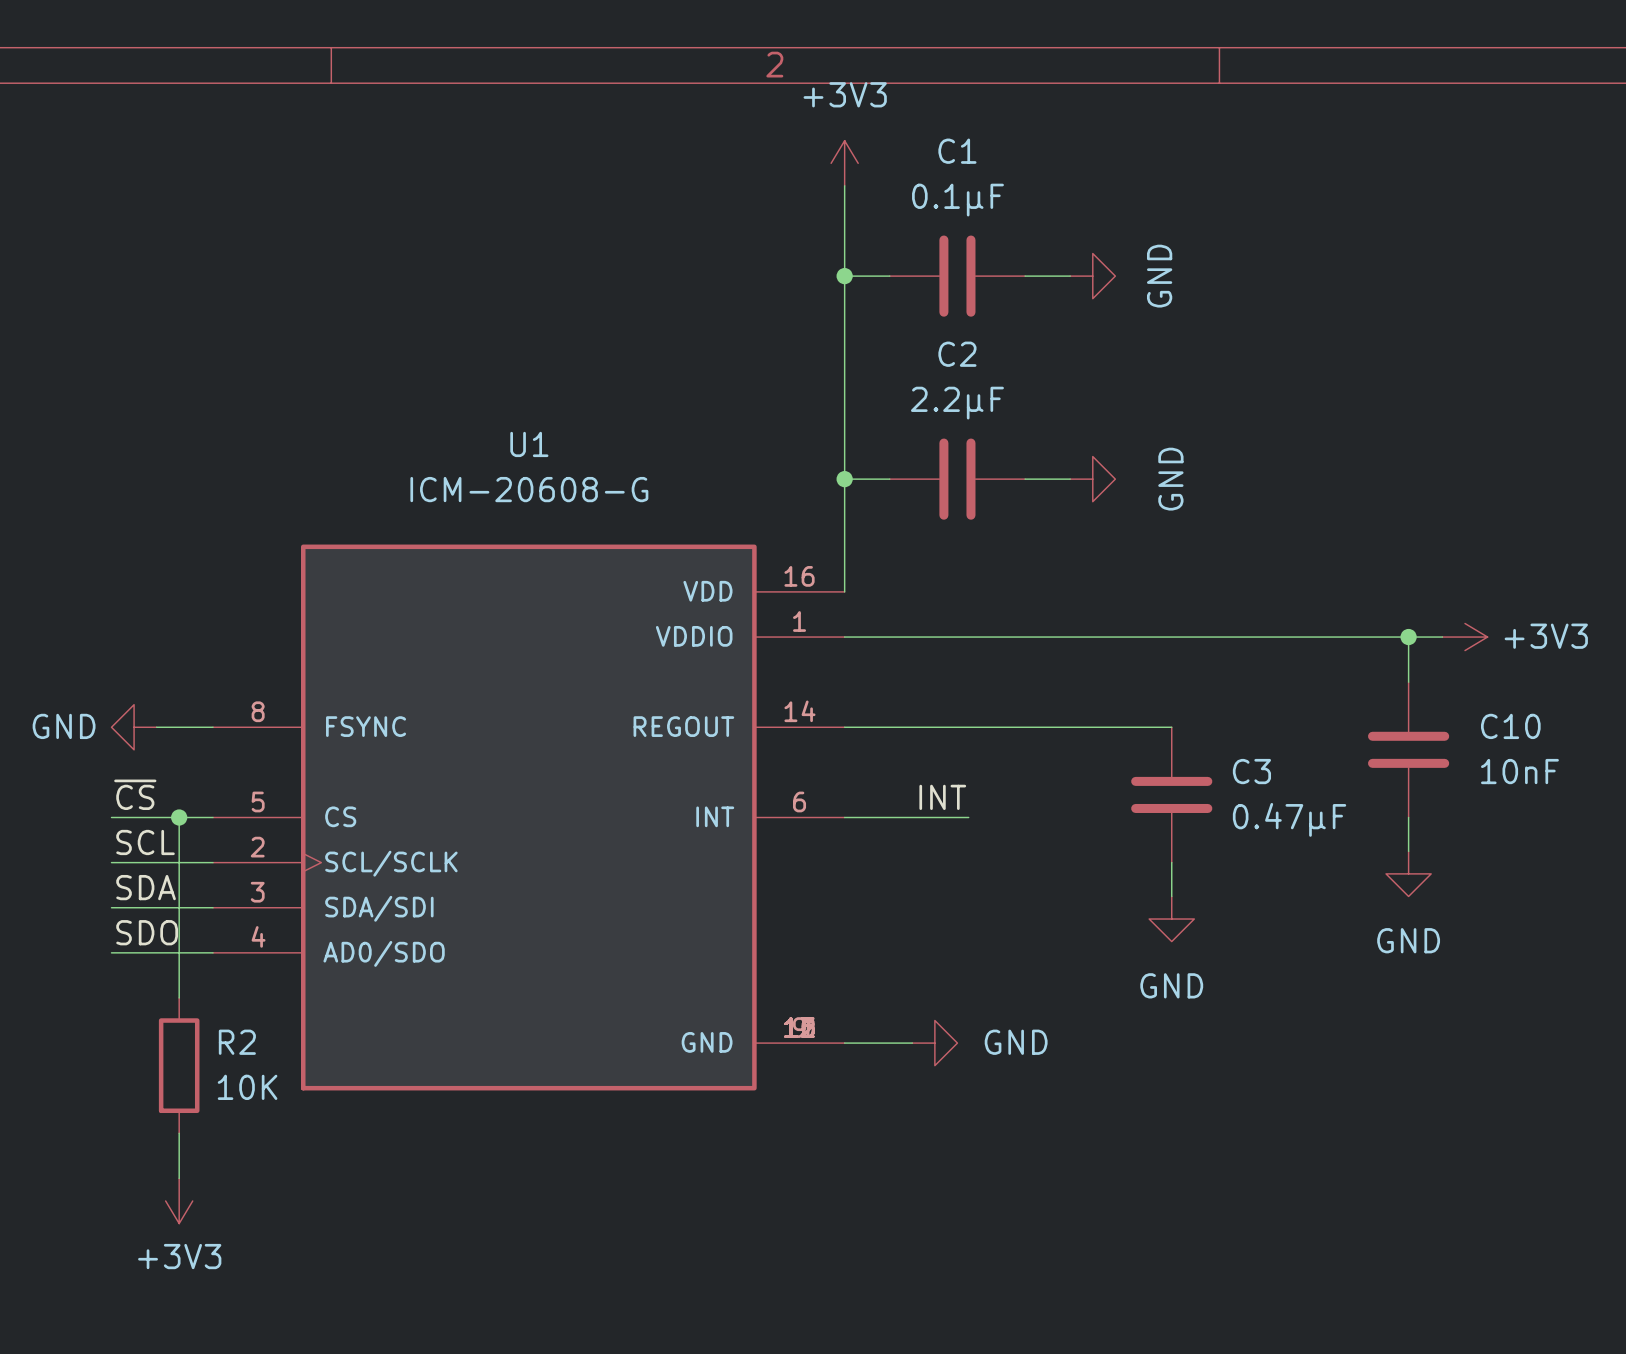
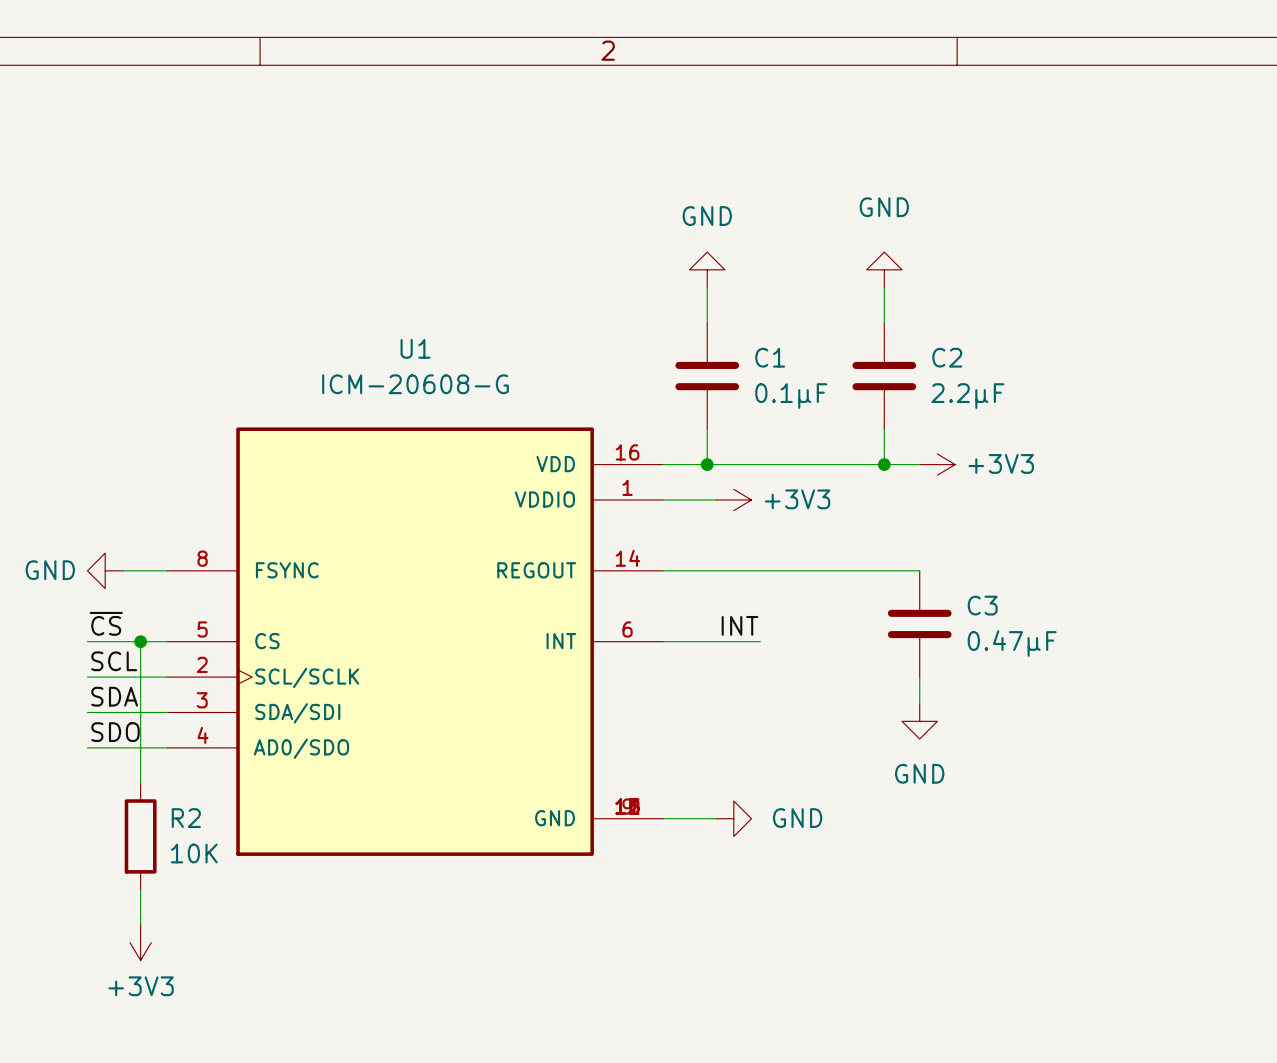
C1 name position: C1 (957, 151) -> C1 (770, 357)
power symbol: +3V3 (844, 163) -> none
wire: (844, 185) (844, 591) -> (919, 464) (662, 464)
C1 value position: 0.1µF (957, 200) -> 0.1µF (791, 396)
wire: (844, 276) (889, 276) -> none
junction: (844, 276) -> none
C1 rotation: 0° (957, 276) -> 90° clockwise (707, 376)
C1 position: (957, 276) -> (707, 376)
wire: (1025, 276) (1070, 276) -> none
power symbol: GND (1092, 276) -> none
power symbol: none -> GND (707, 269)
power symbol: none -> GND (884, 269)
C2 name position: C2 (957, 354) -> C2 (947, 357)
wire: none -> (707, 287) (707, 322)
wire: none -> (884, 287) (884, 322)
C2 value position: 2.2µF (957, 403) -> 2.2µF (967, 396)
wire: (844, 479) (889, 479) -> none
junction: (844, 479) -> none
C2 rotation: 0° (957, 479) -> 90° clockwise (884, 376)
C2 position: (957, 479) -> (884, 376)
wire: (1025, 479) (1070, 479) -> none
power symbol: GND (1092, 479) -> none
wire: none -> (707, 429) (707, 464)
junction: none -> (707, 464)
junction: none -> (884, 464)
power symbol: none -> +3V3 (937, 464)
wire: (912, 637) (1442, 637) -> none
power symbol: none -> +3V3 (733, 500)
wire: (1408, 637) (1408, 682) -> (884, 429) (884, 464)
junction: (1408, 637) -> none
power symbol: +3V3 (1464, 637) -> none
C10: 10nF (1408, 749) -> none
wire: (1408, 817) (1408, 851) -> none
power symbol: GND (1408, 873) -> none

